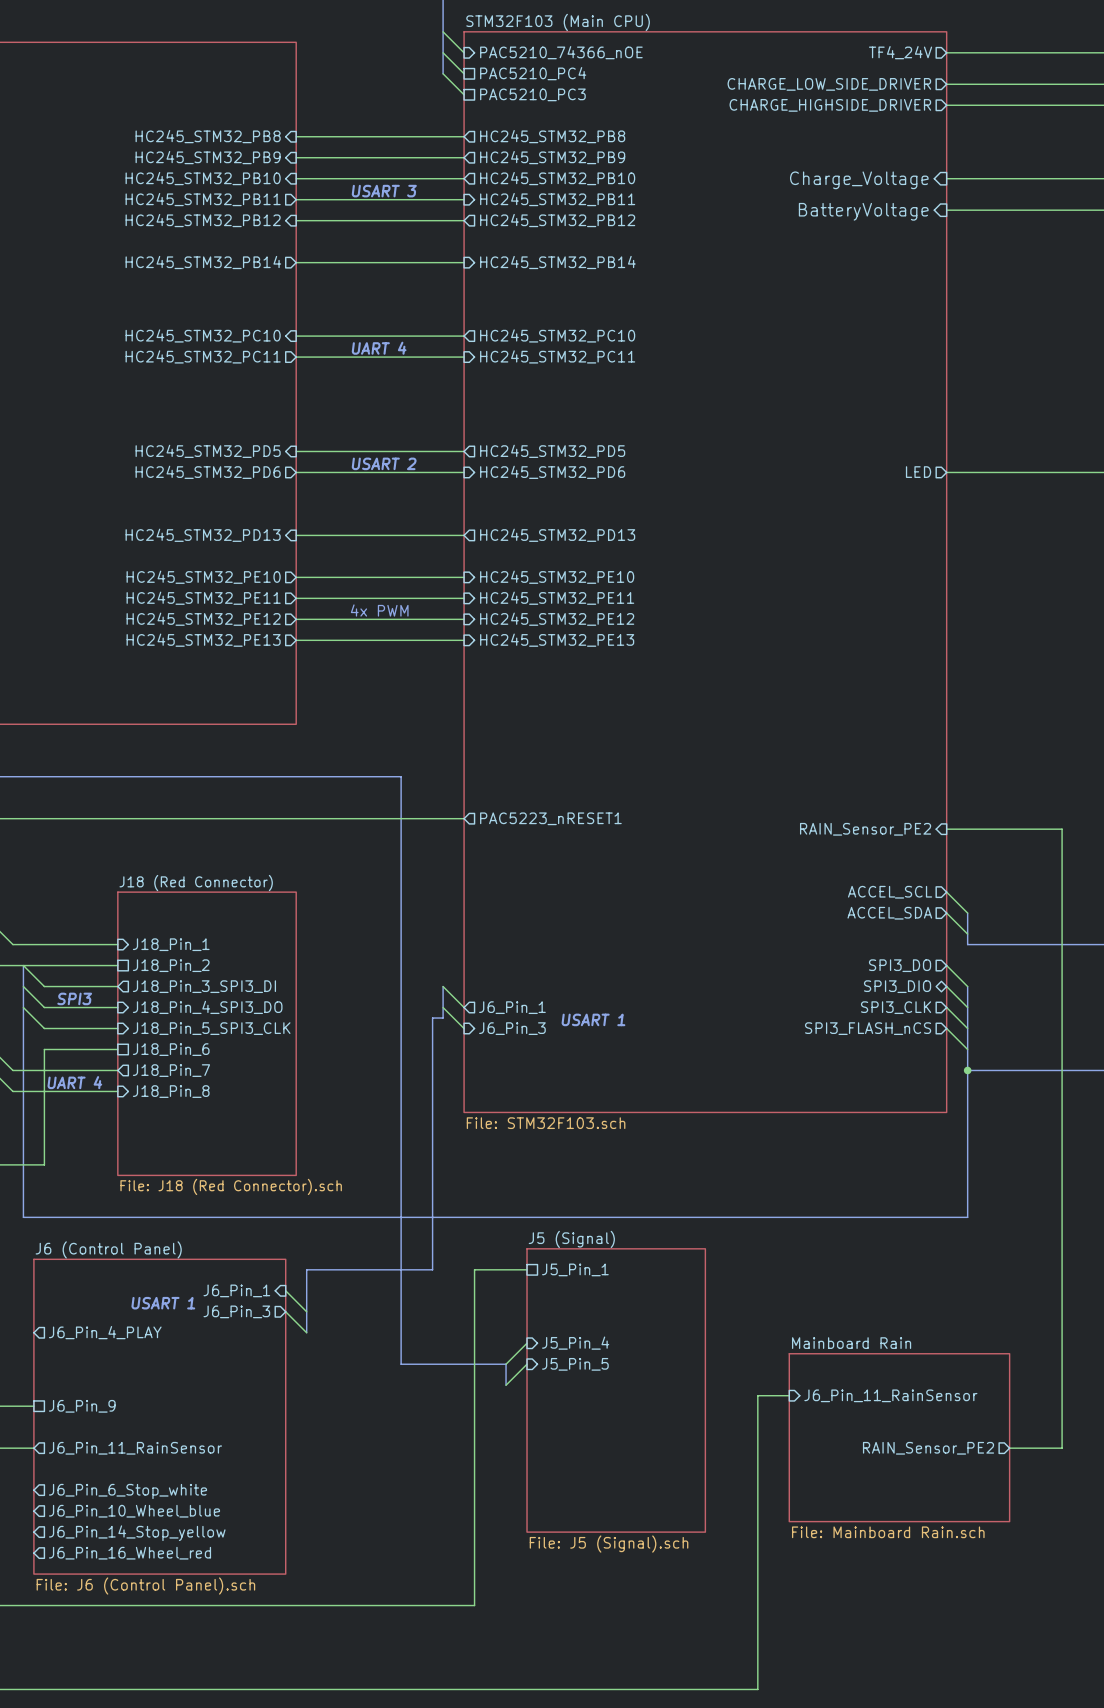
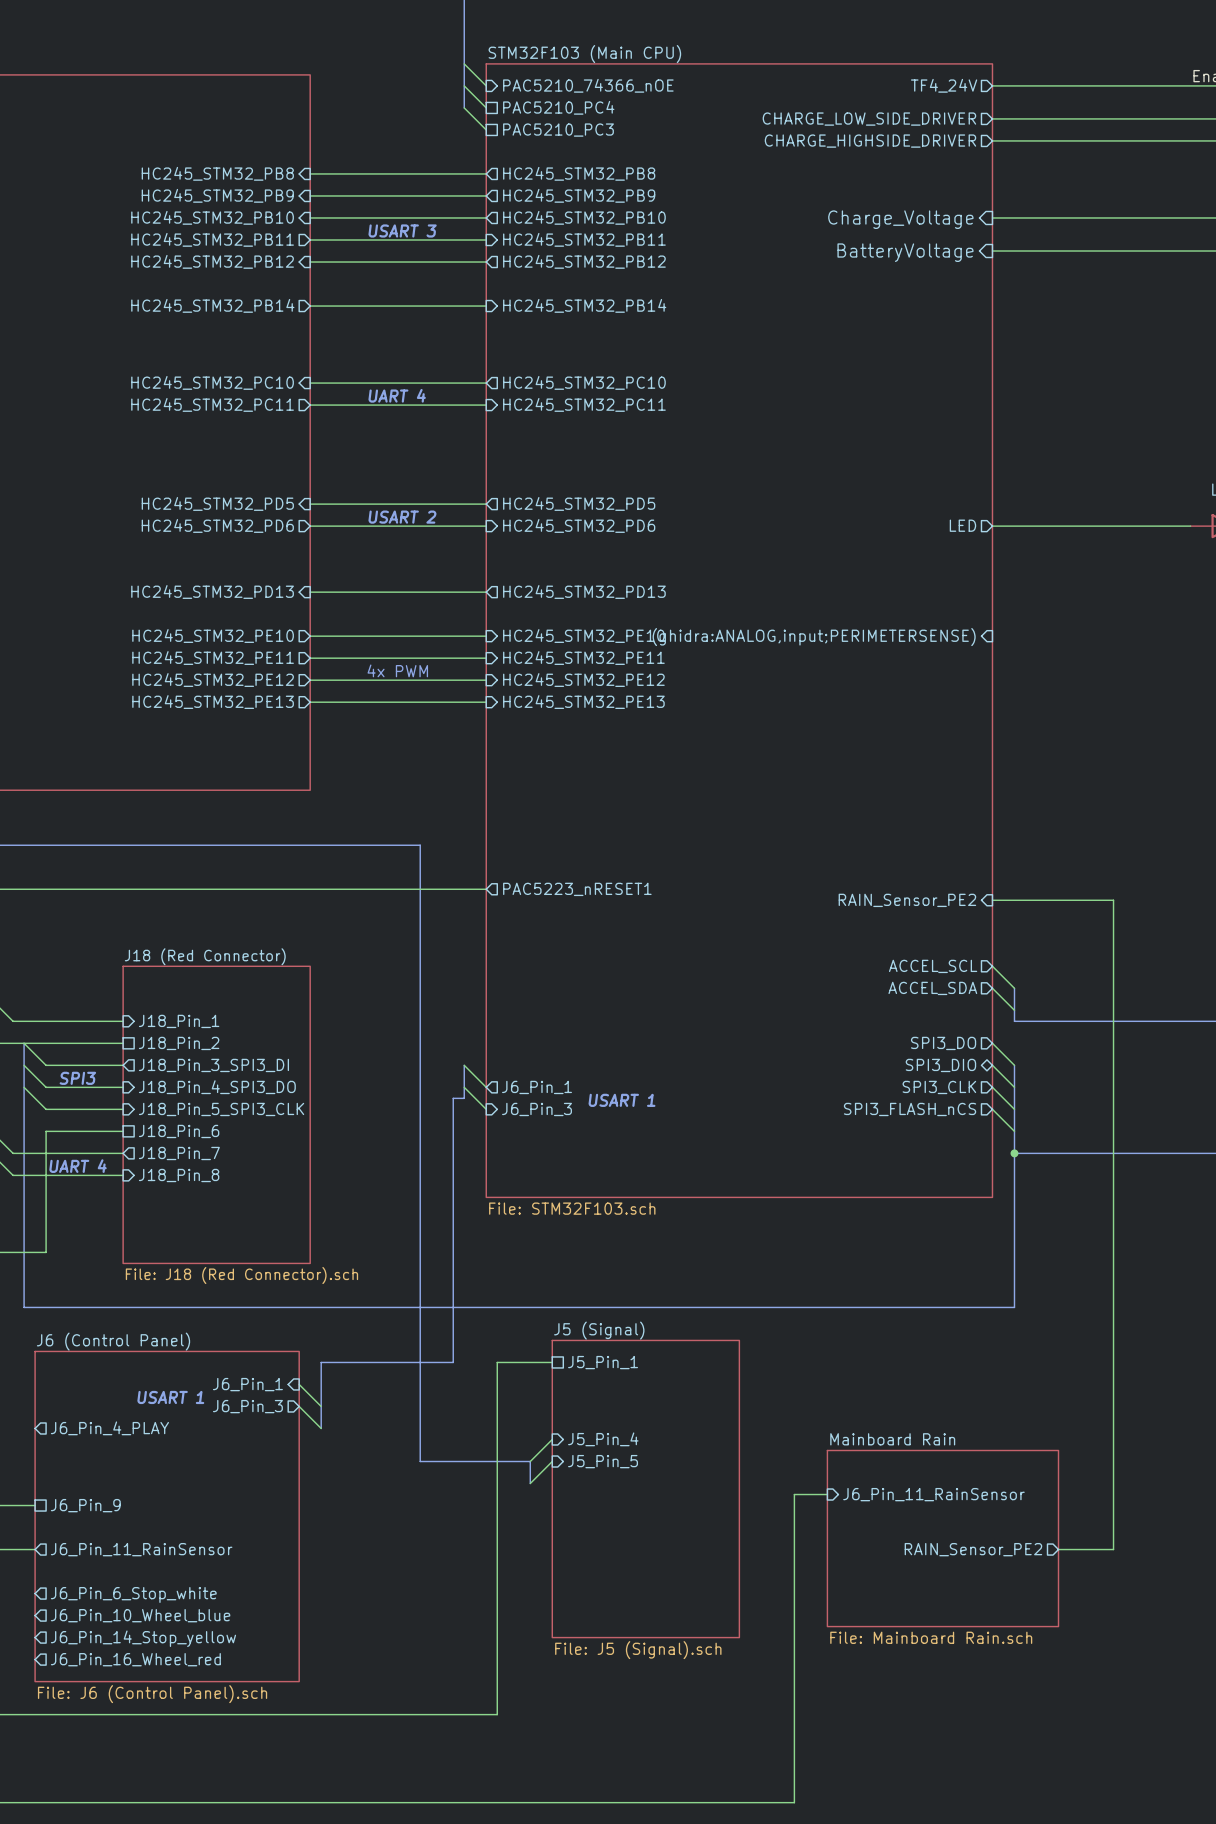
sheet pin: none -> (ghidra:ANALOG,input;PERIMETERSENSE) (814, 637)

